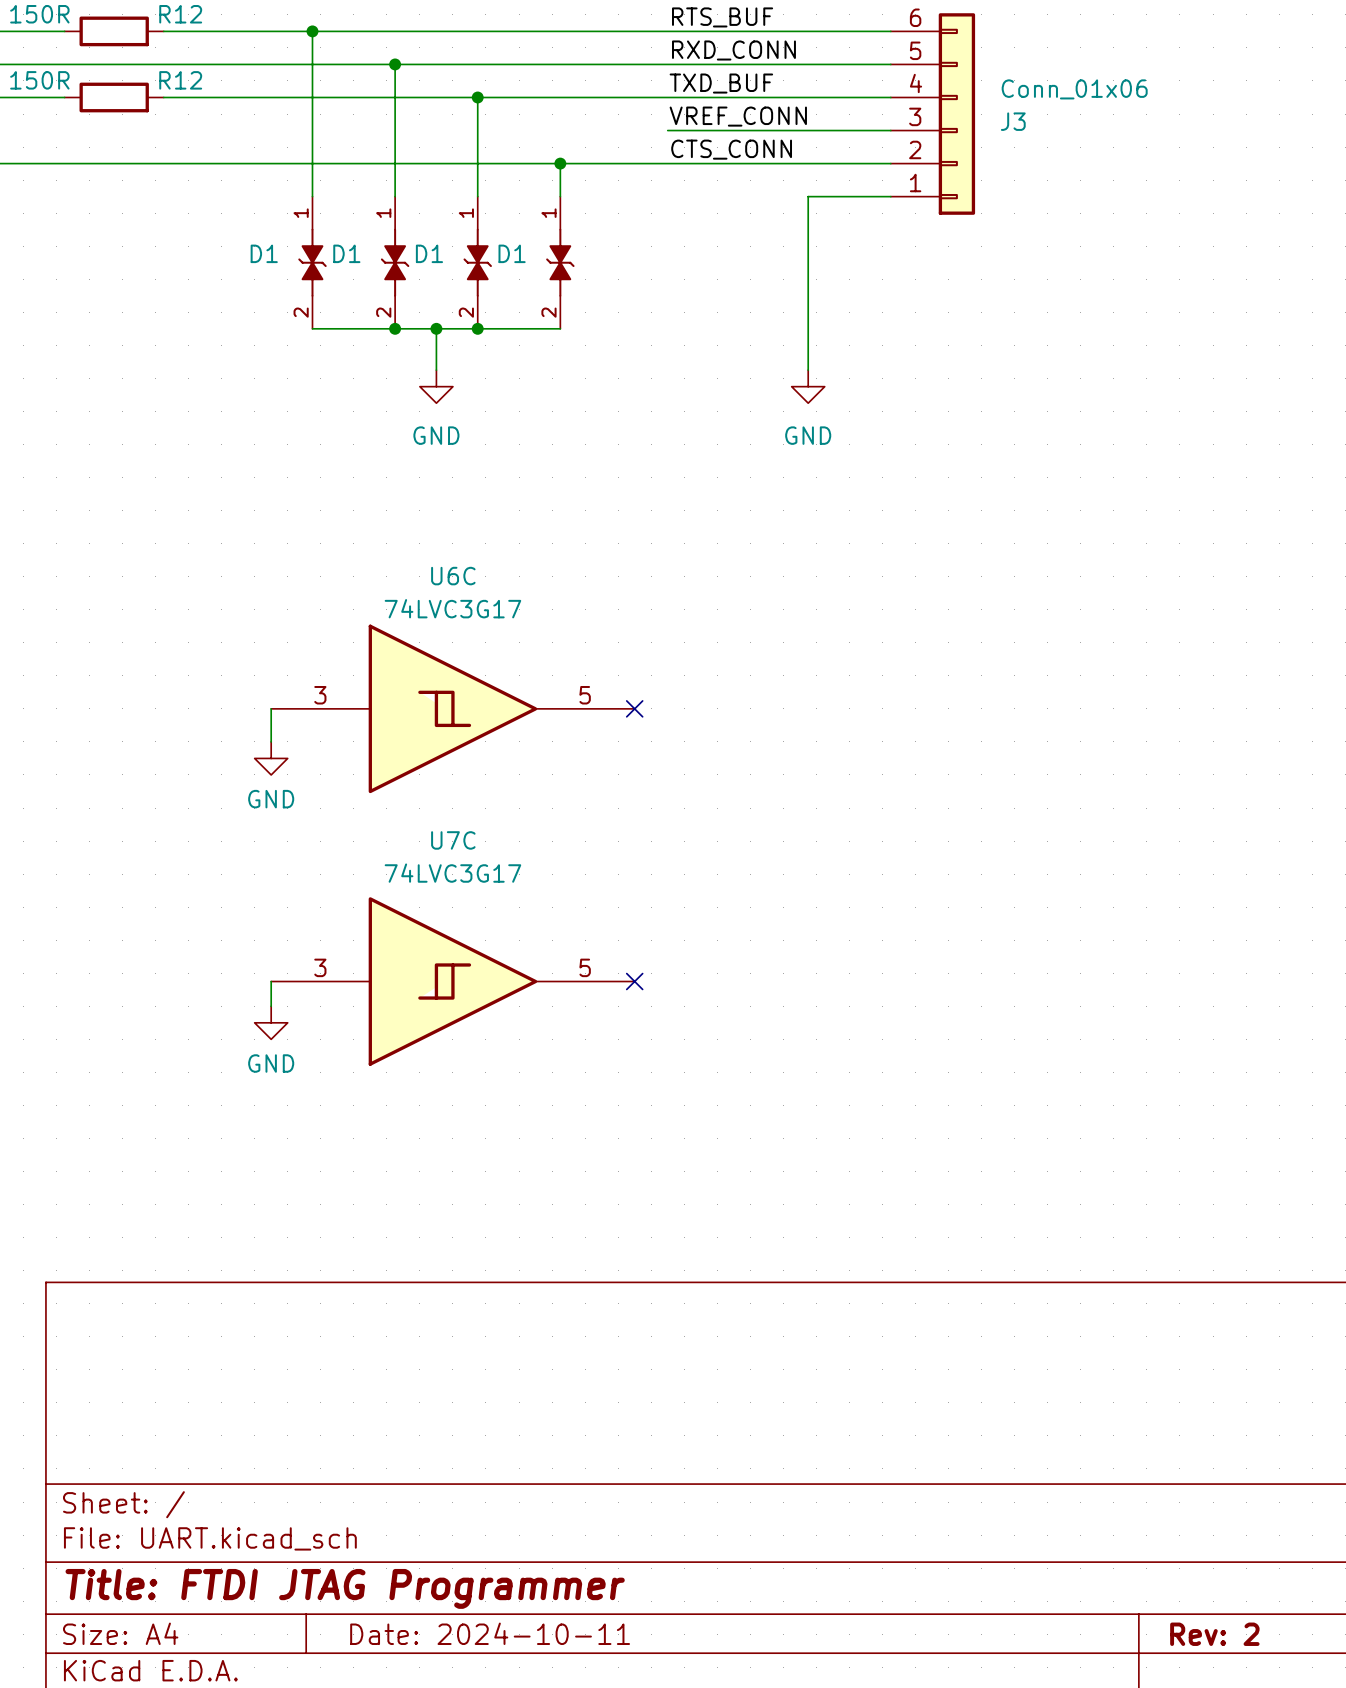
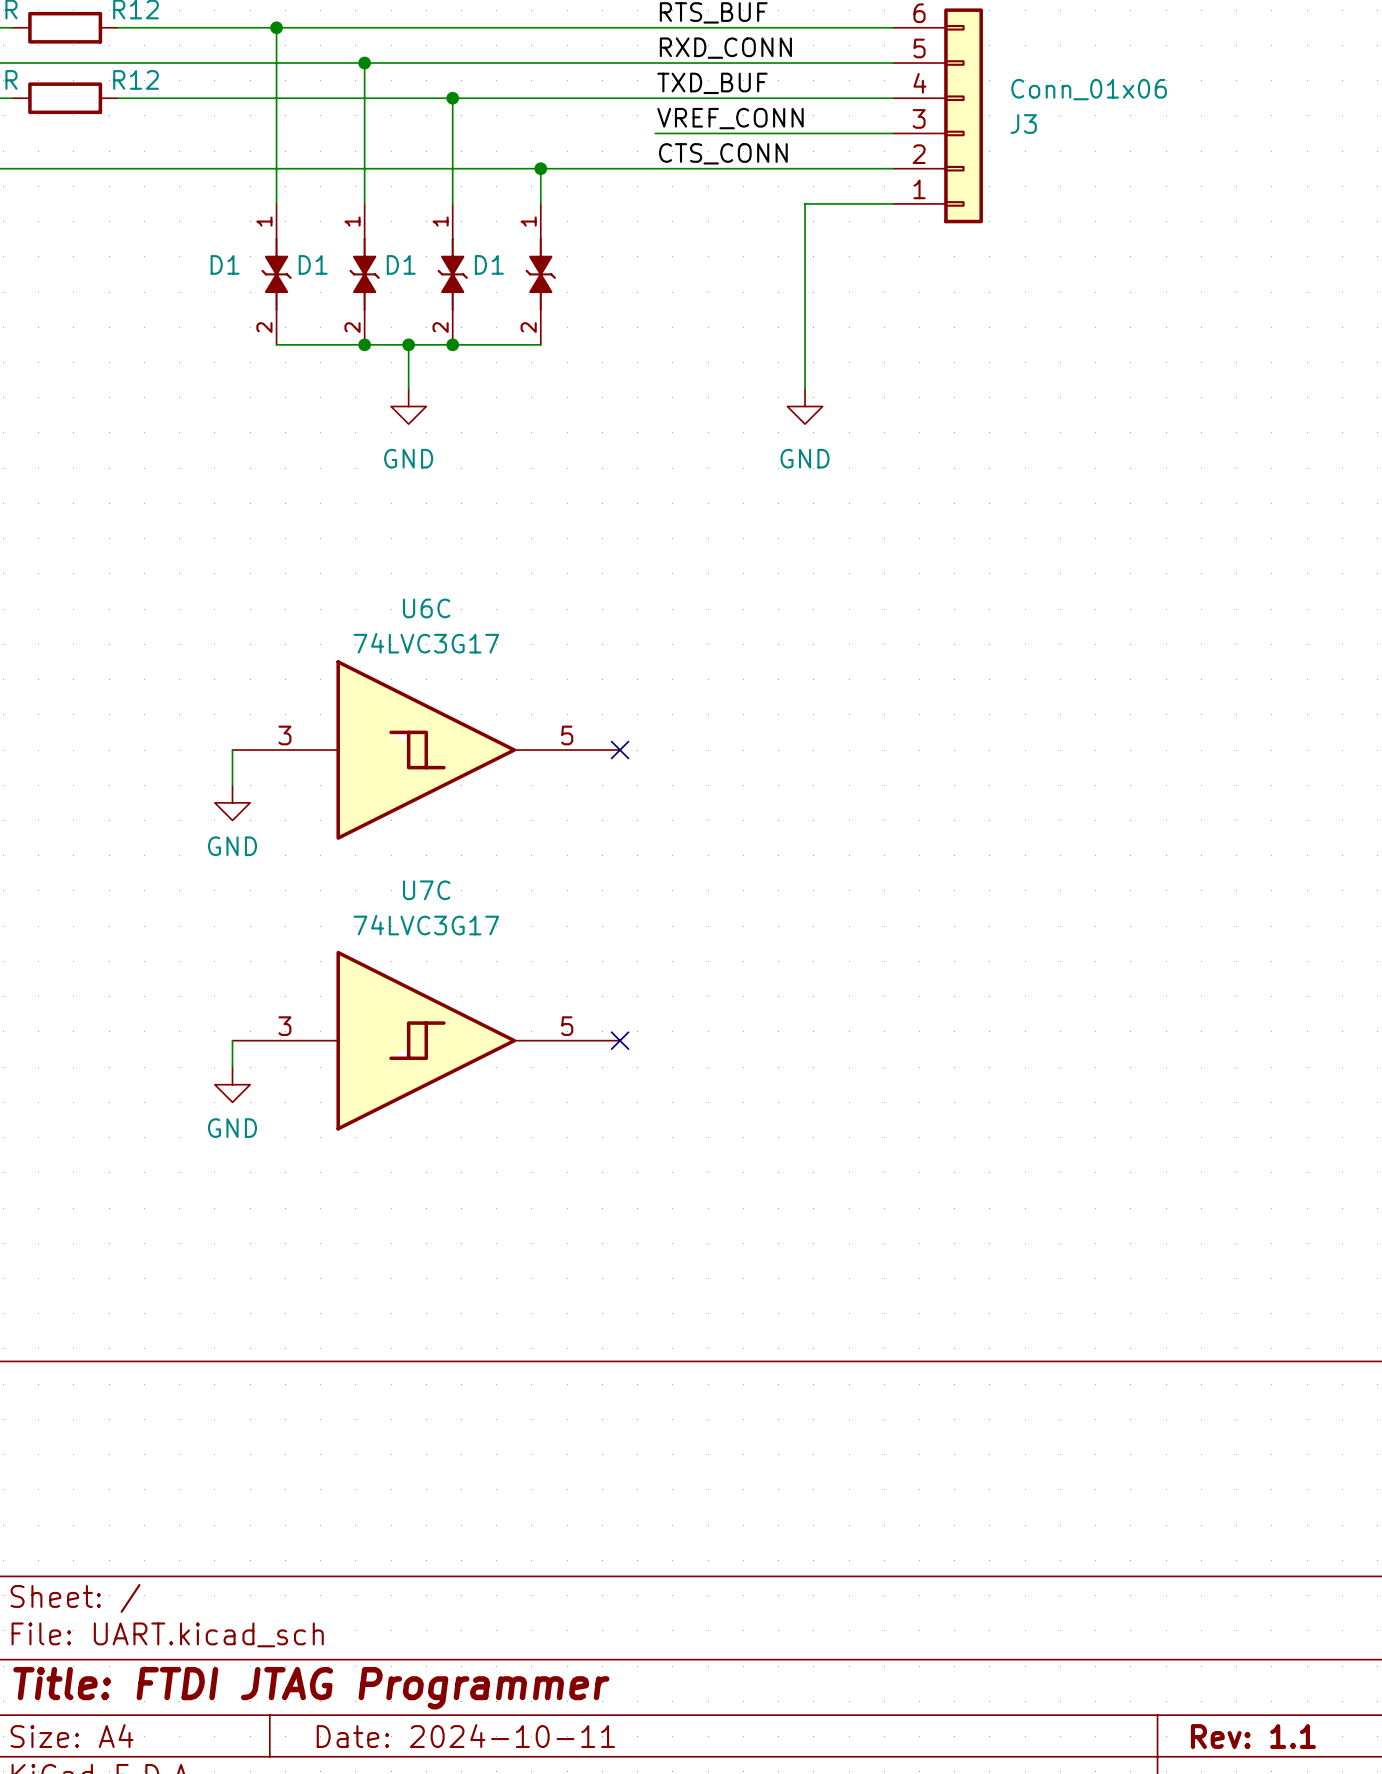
title block: Rev: 2 (1214, 1634) -> Rev: 1.1 (1253, 1736)

